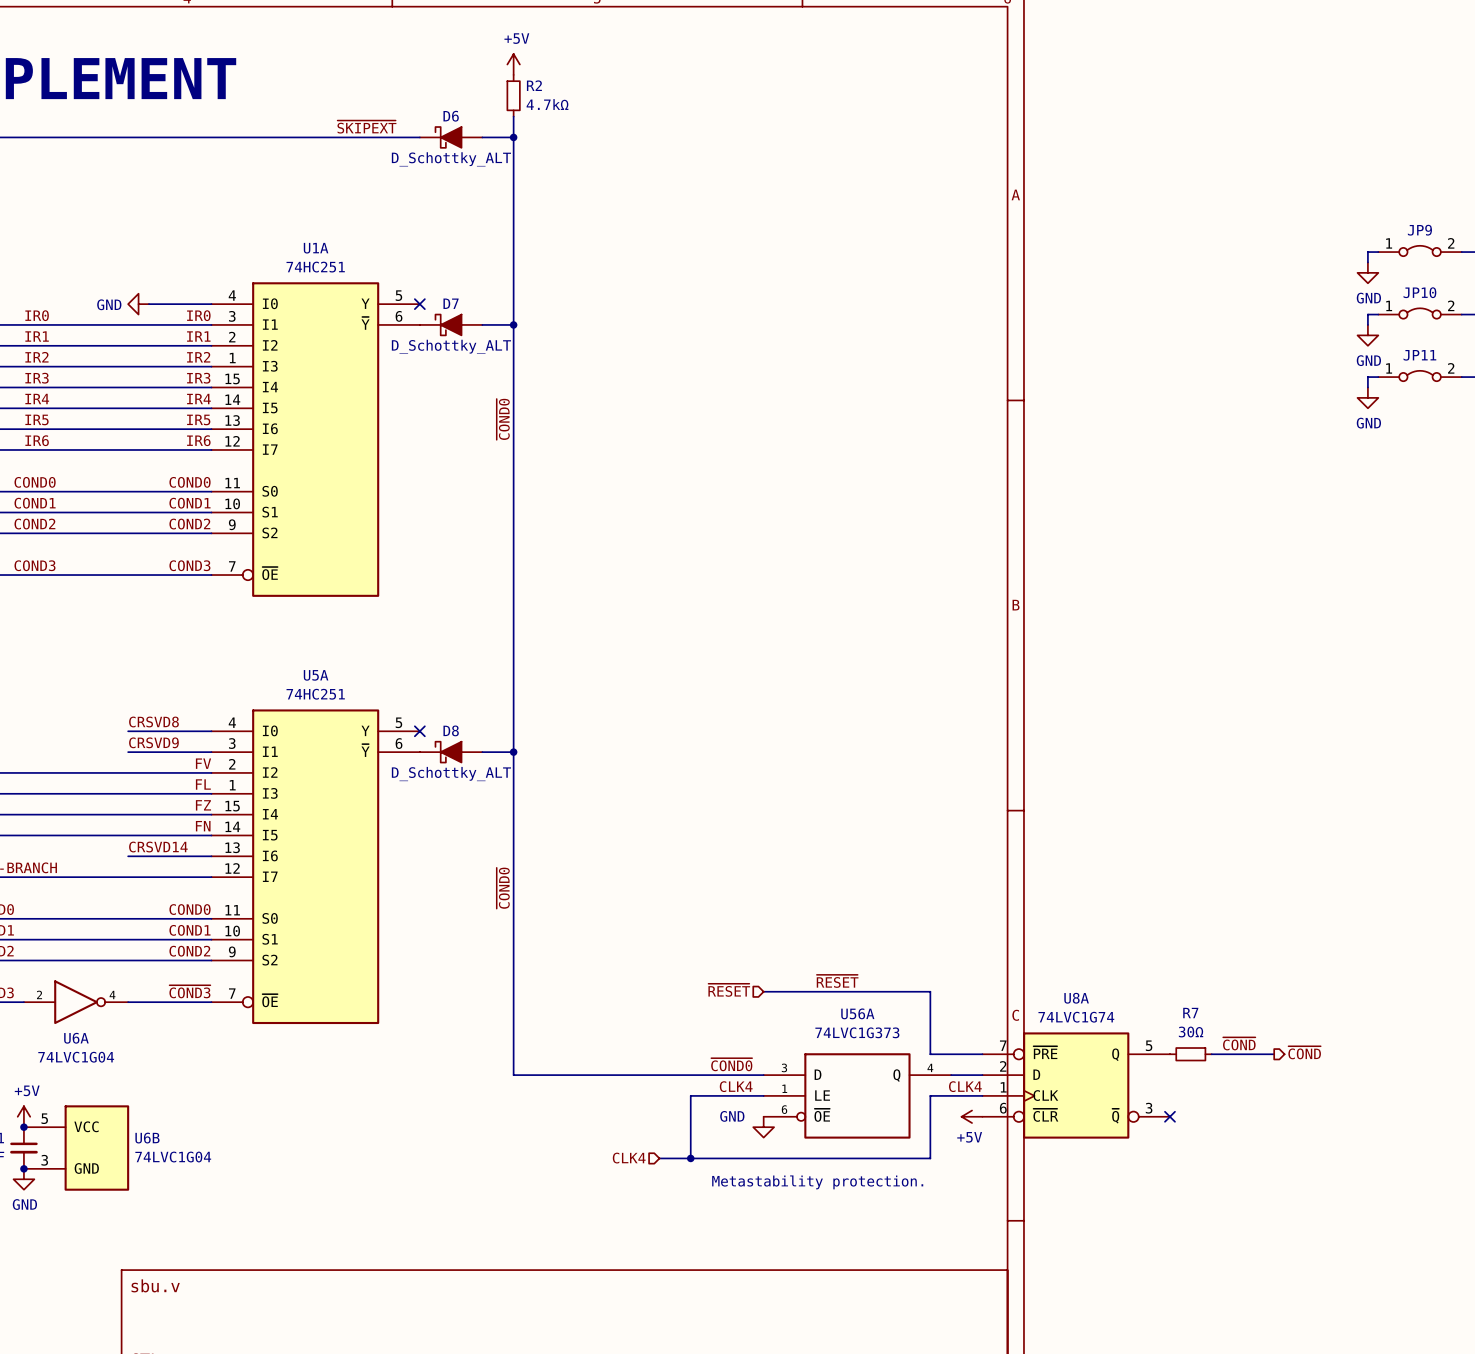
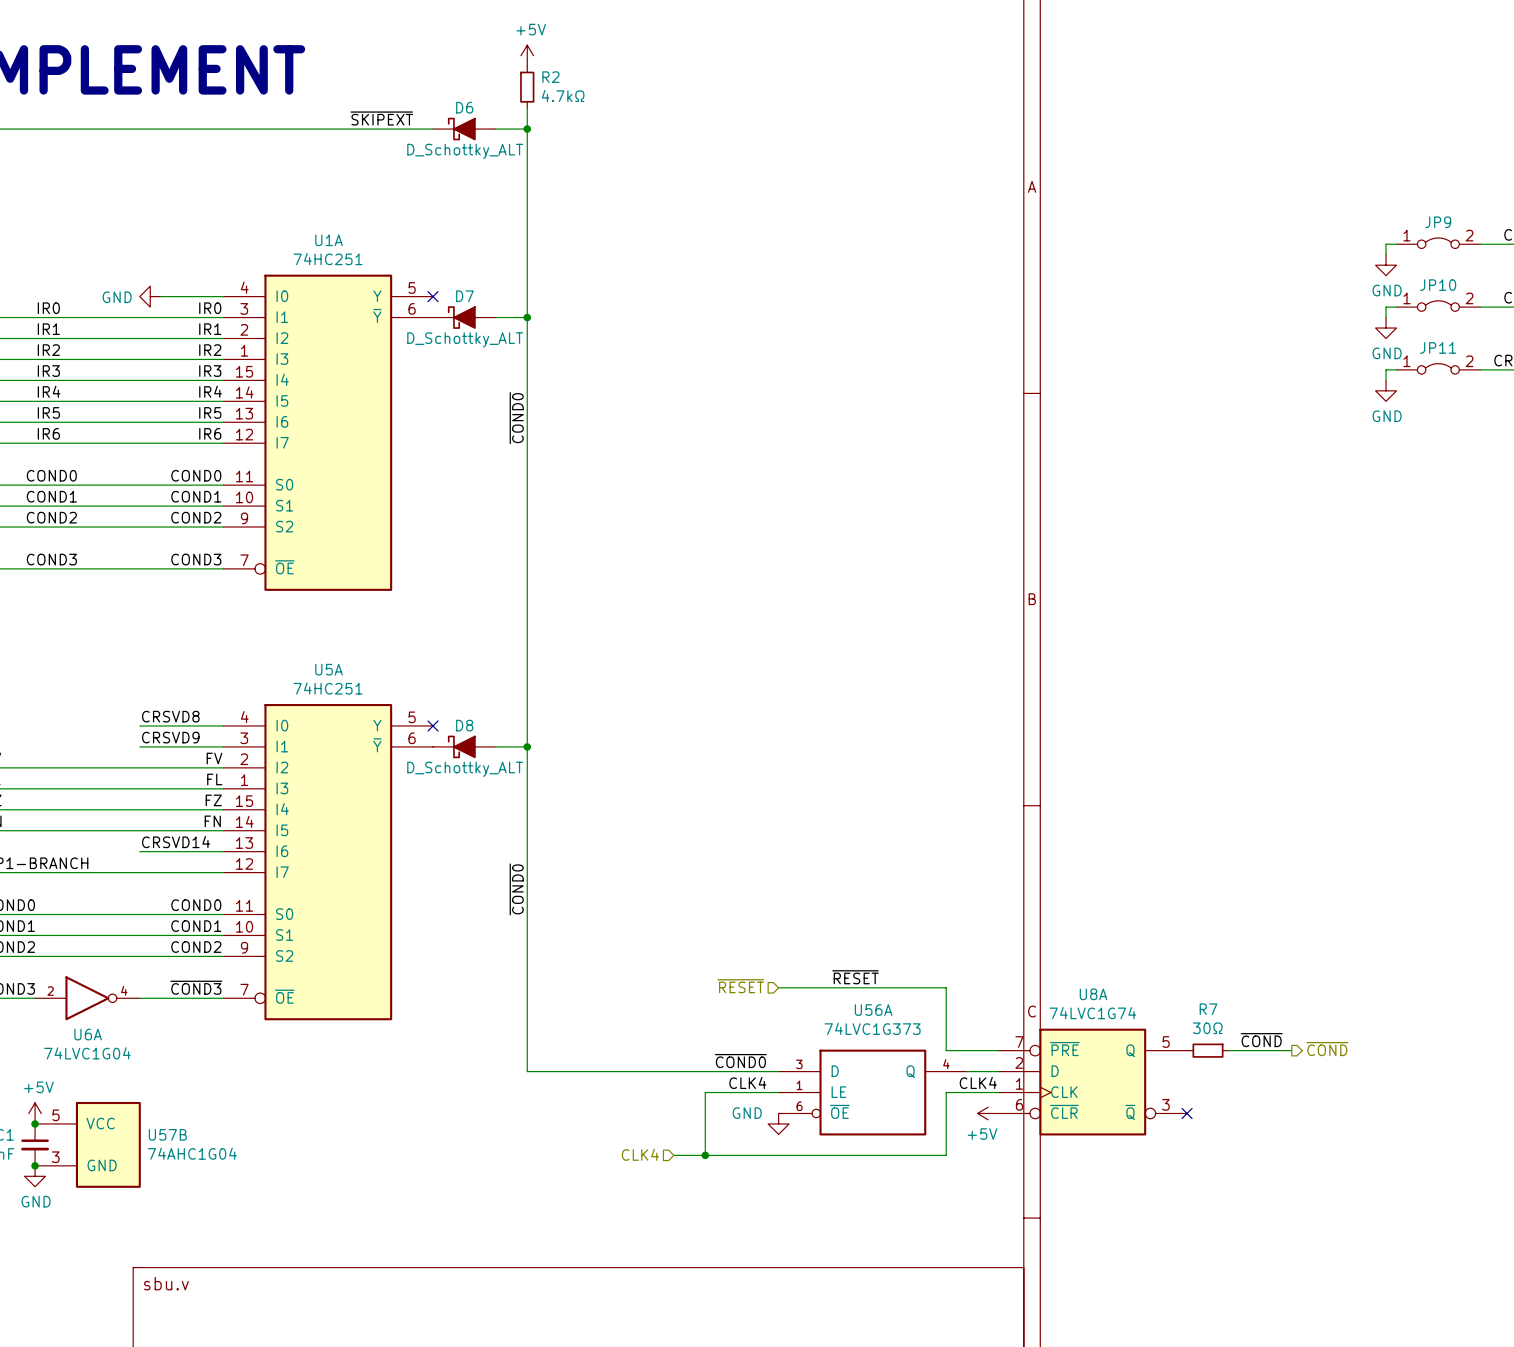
U6B name: U6B (147, 1138) -> U57B (167, 1134)
U6B value: 74LVC1G04 (173, 1157) -> 74AHC1G04 (192, 1153)
text: Metastability protection. (817, 1182) -> none

